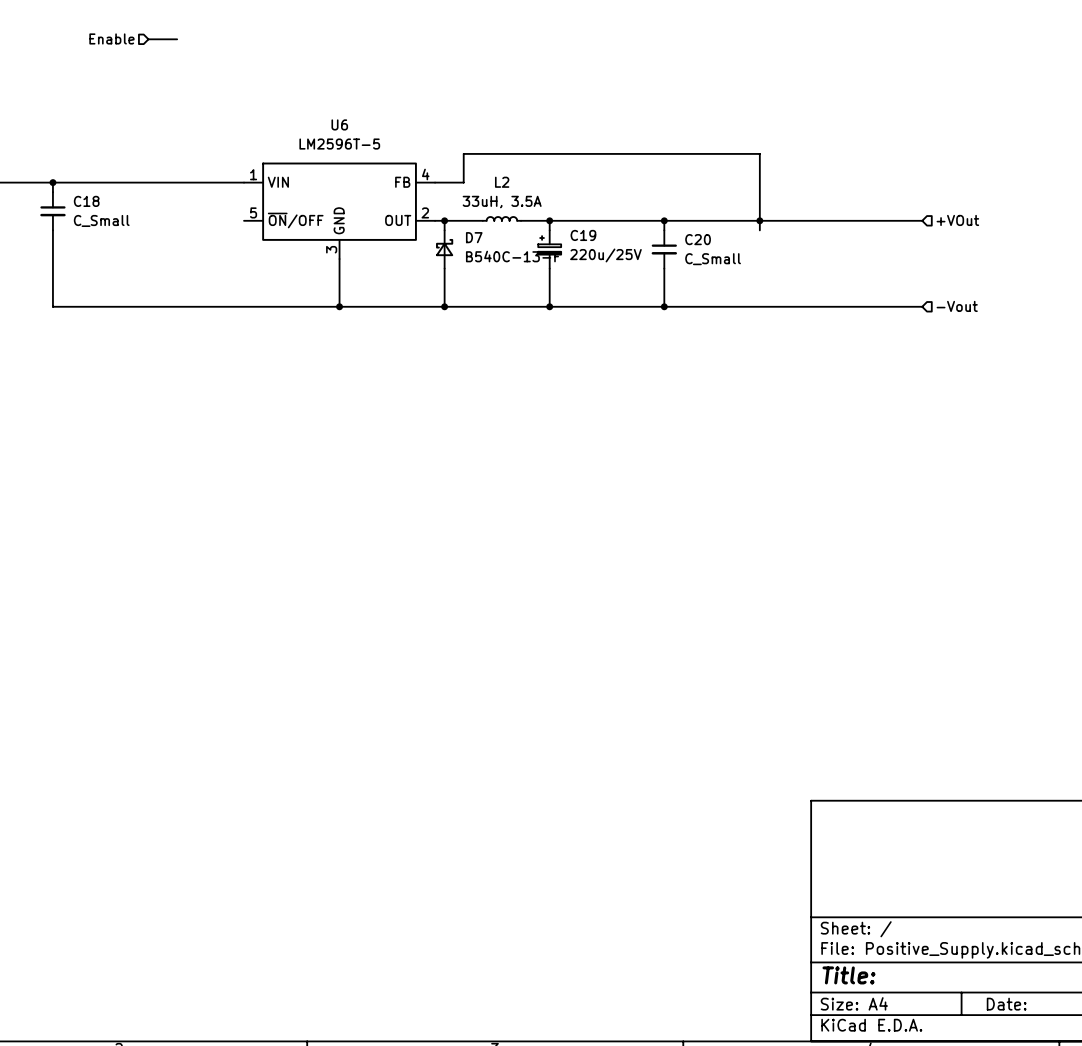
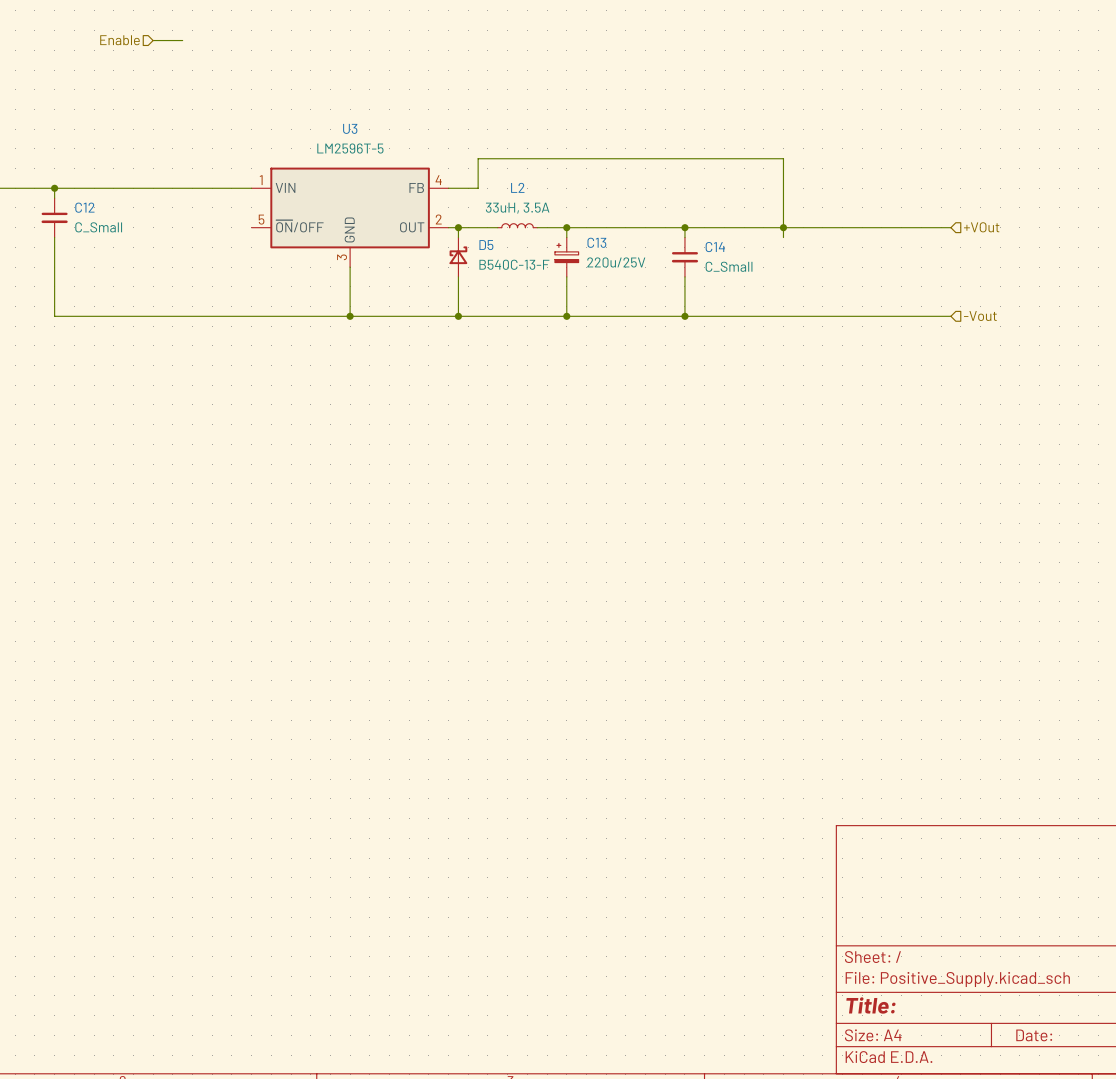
U6 name: U6 (339, 124) -> U3 (350, 128)
C18 name: C18 (86, 201) -> C12 (84, 207)
C19 name: C19 (583, 235) -> C13 (596, 242)
D7 name: D7 (474, 237) -> D5 (486, 245)
C20 name: C20 (698, 239) -> C14 (715, 247)

